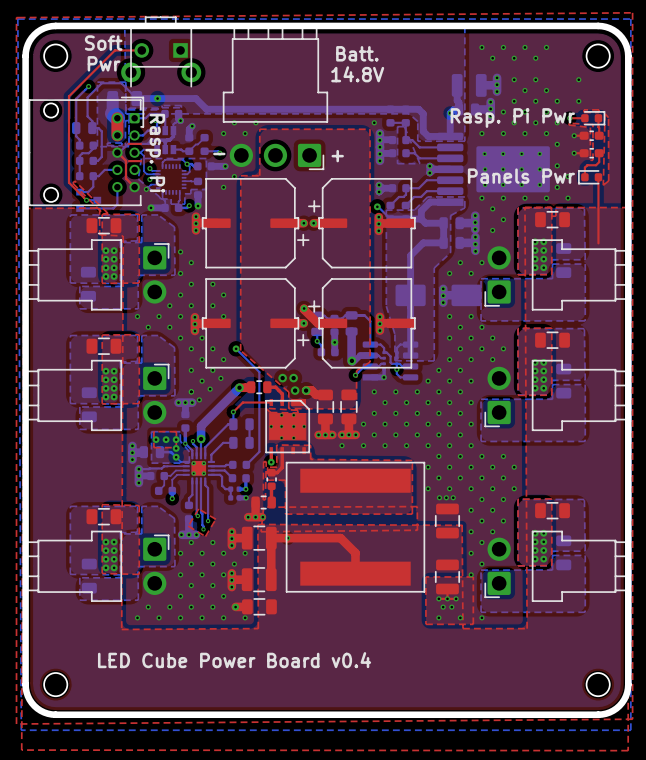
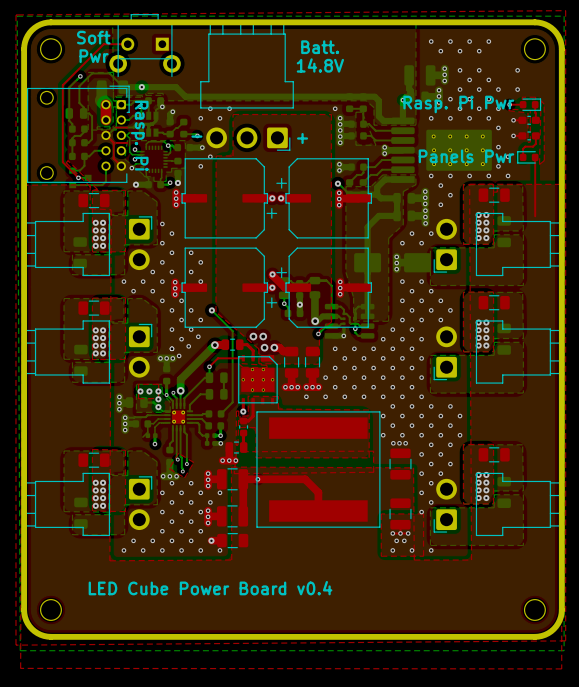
part footprint: [154, 486, 177, 495] -> [145, 433, 158, 439]

